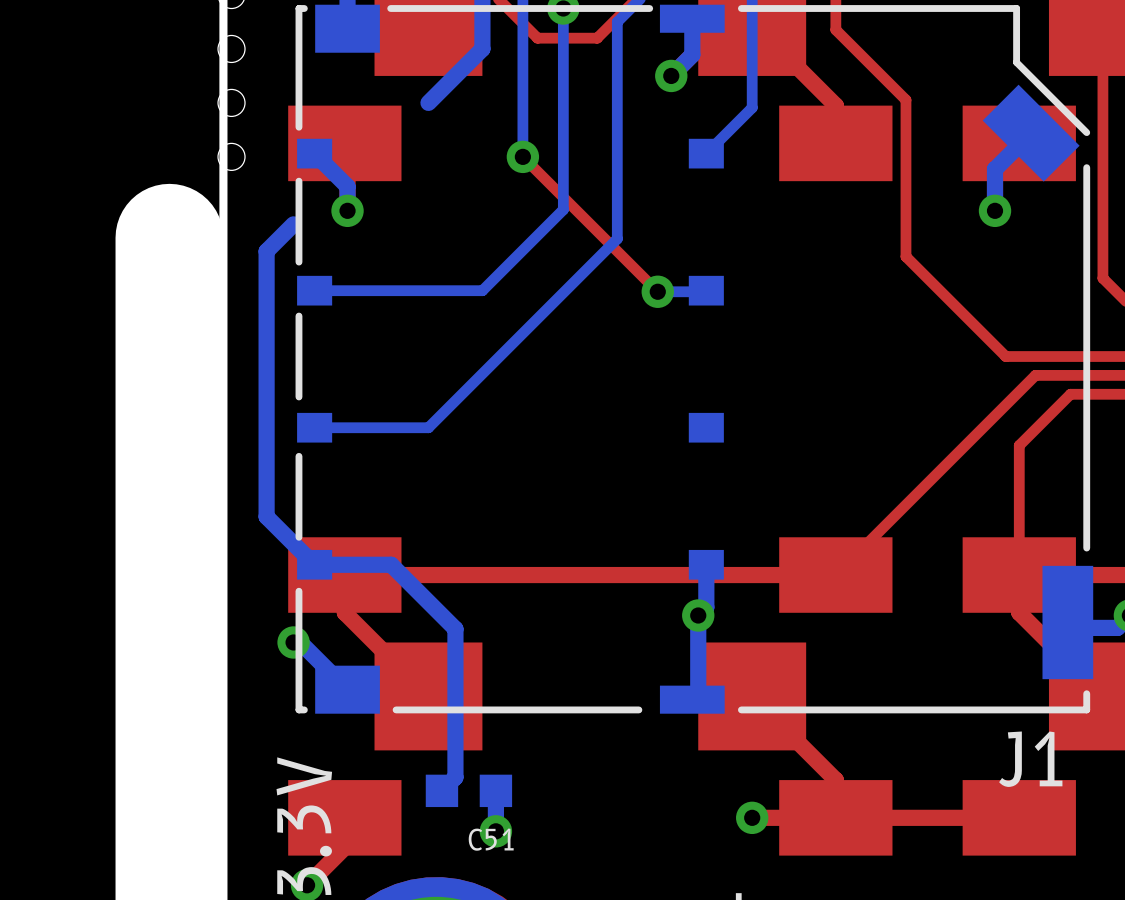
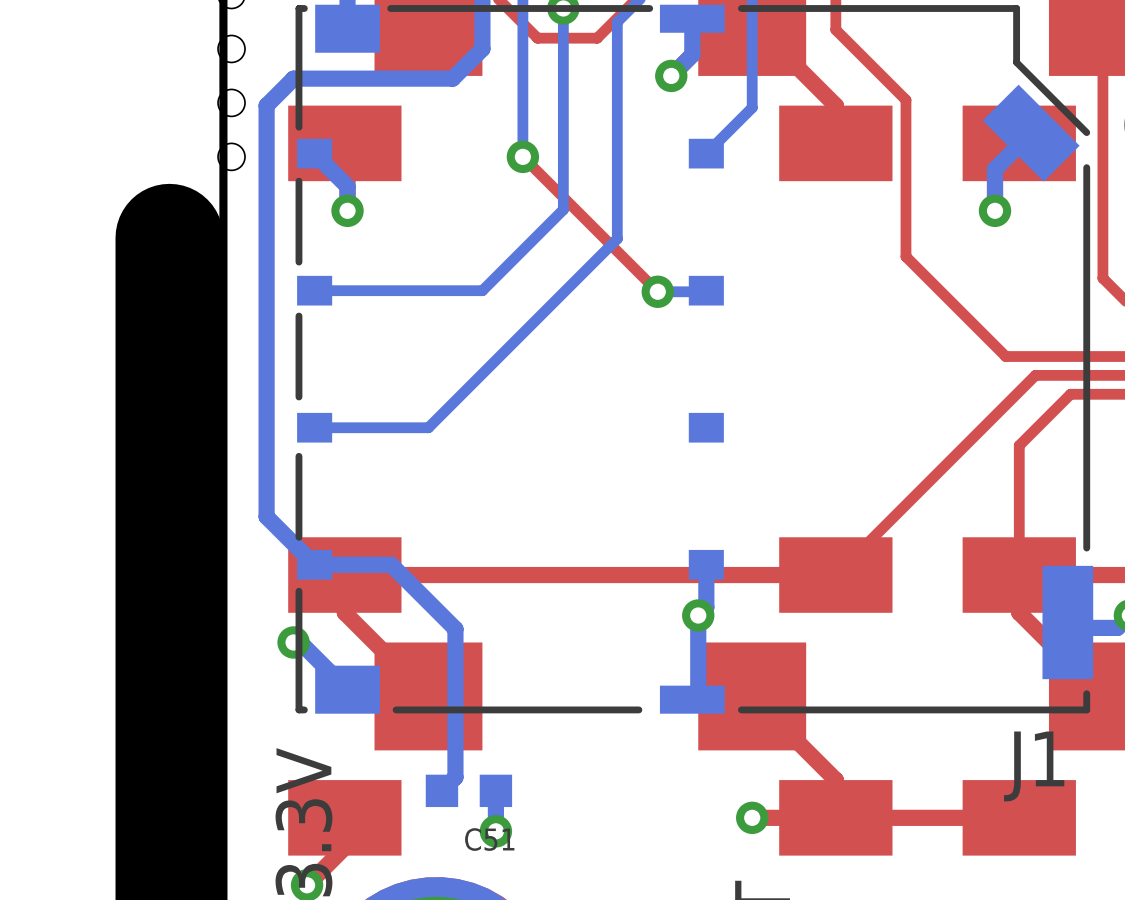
bottom track: (452, 78) (428, 102) -> none
bottom track: (293, 224) (266, 251) -> (452, 78) (293, 78) (266, 105) (266, 251)

